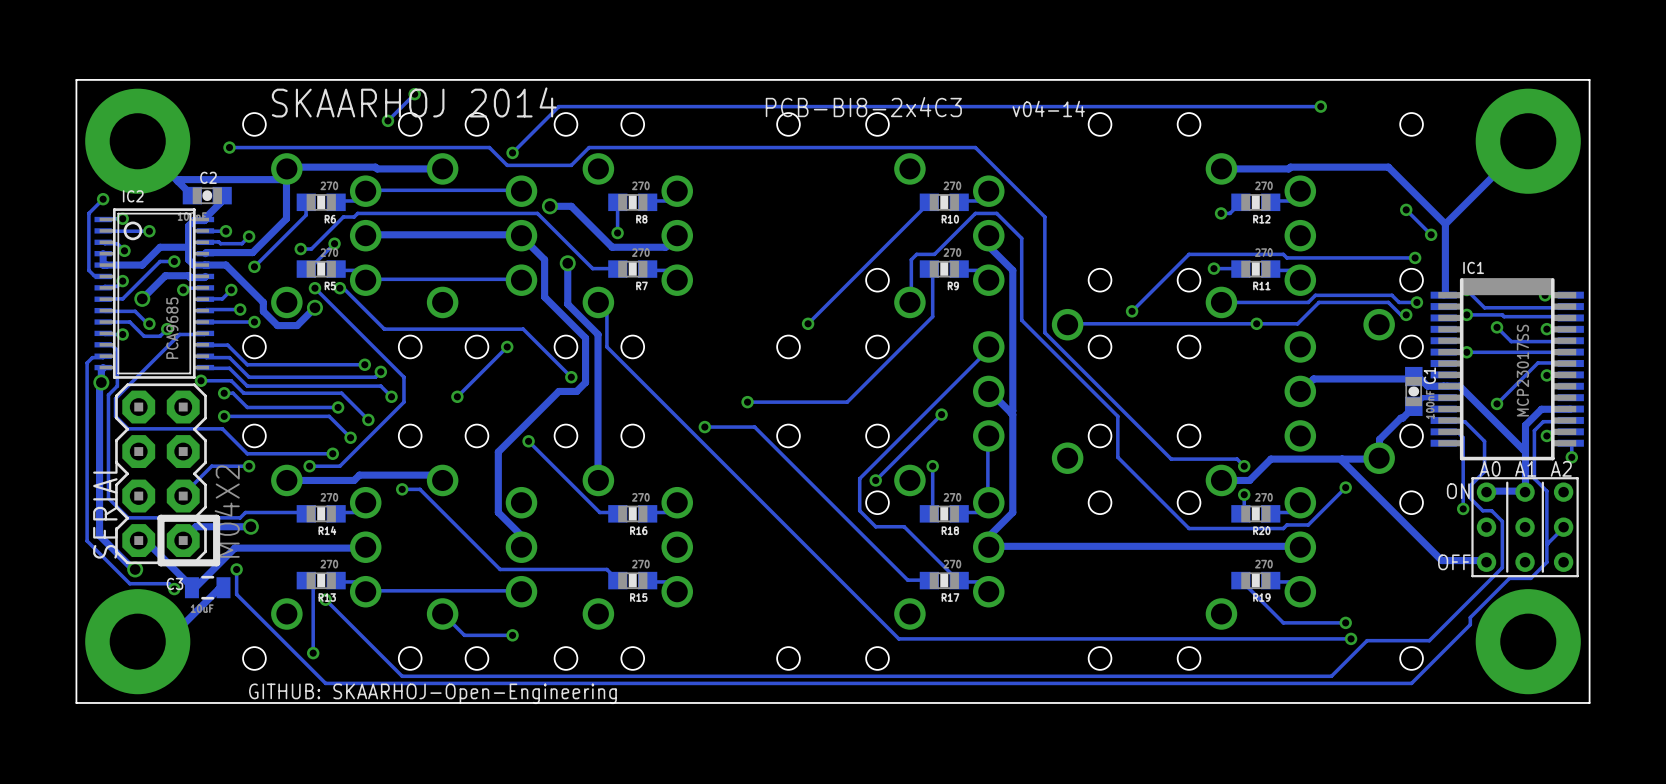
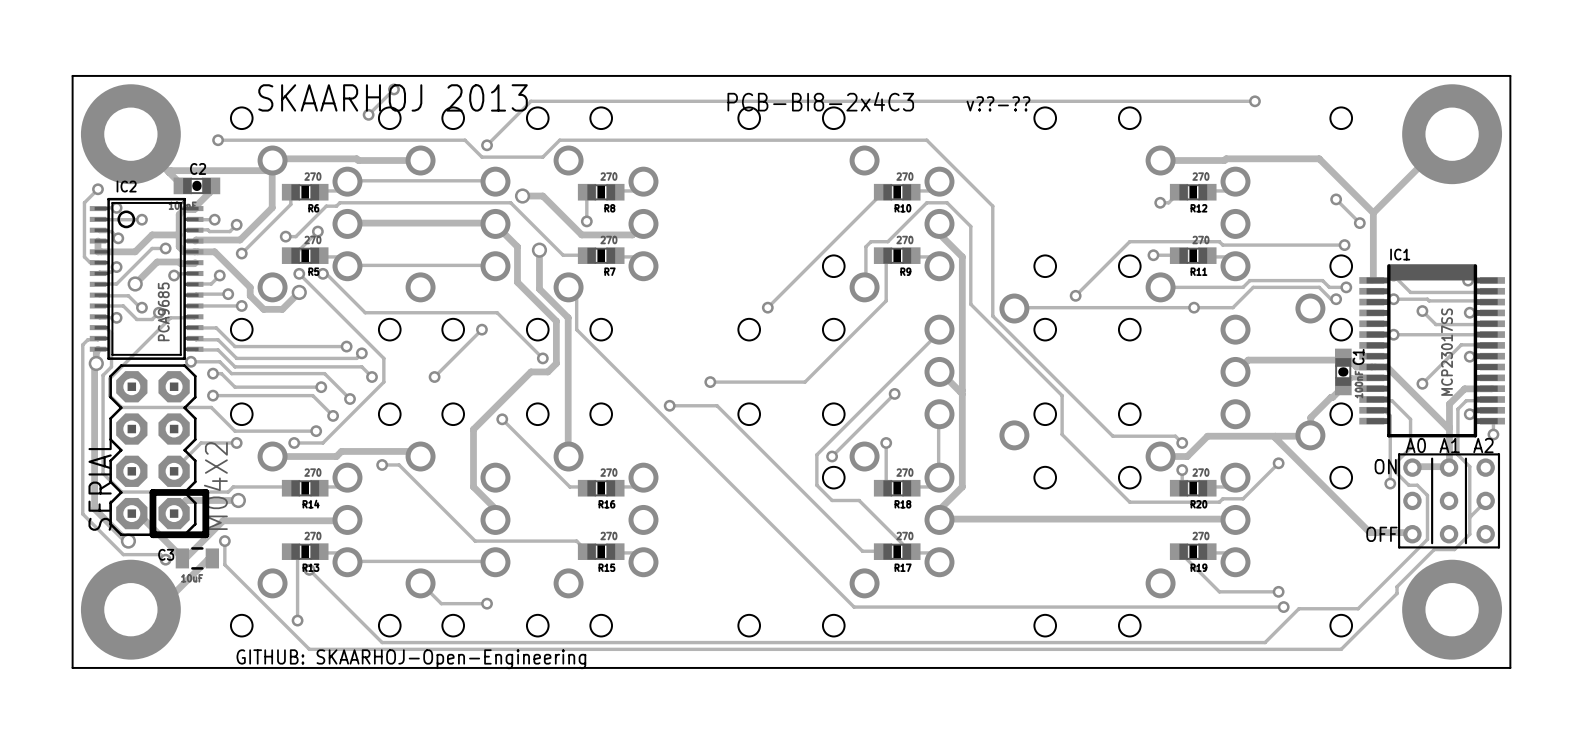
text: SKAARHOJ 2014 (414, 102) -> SKAARHOJ 2013 (393, 97)
text: v04-14 (1048, 108) -> v??-?? (998, 103)

